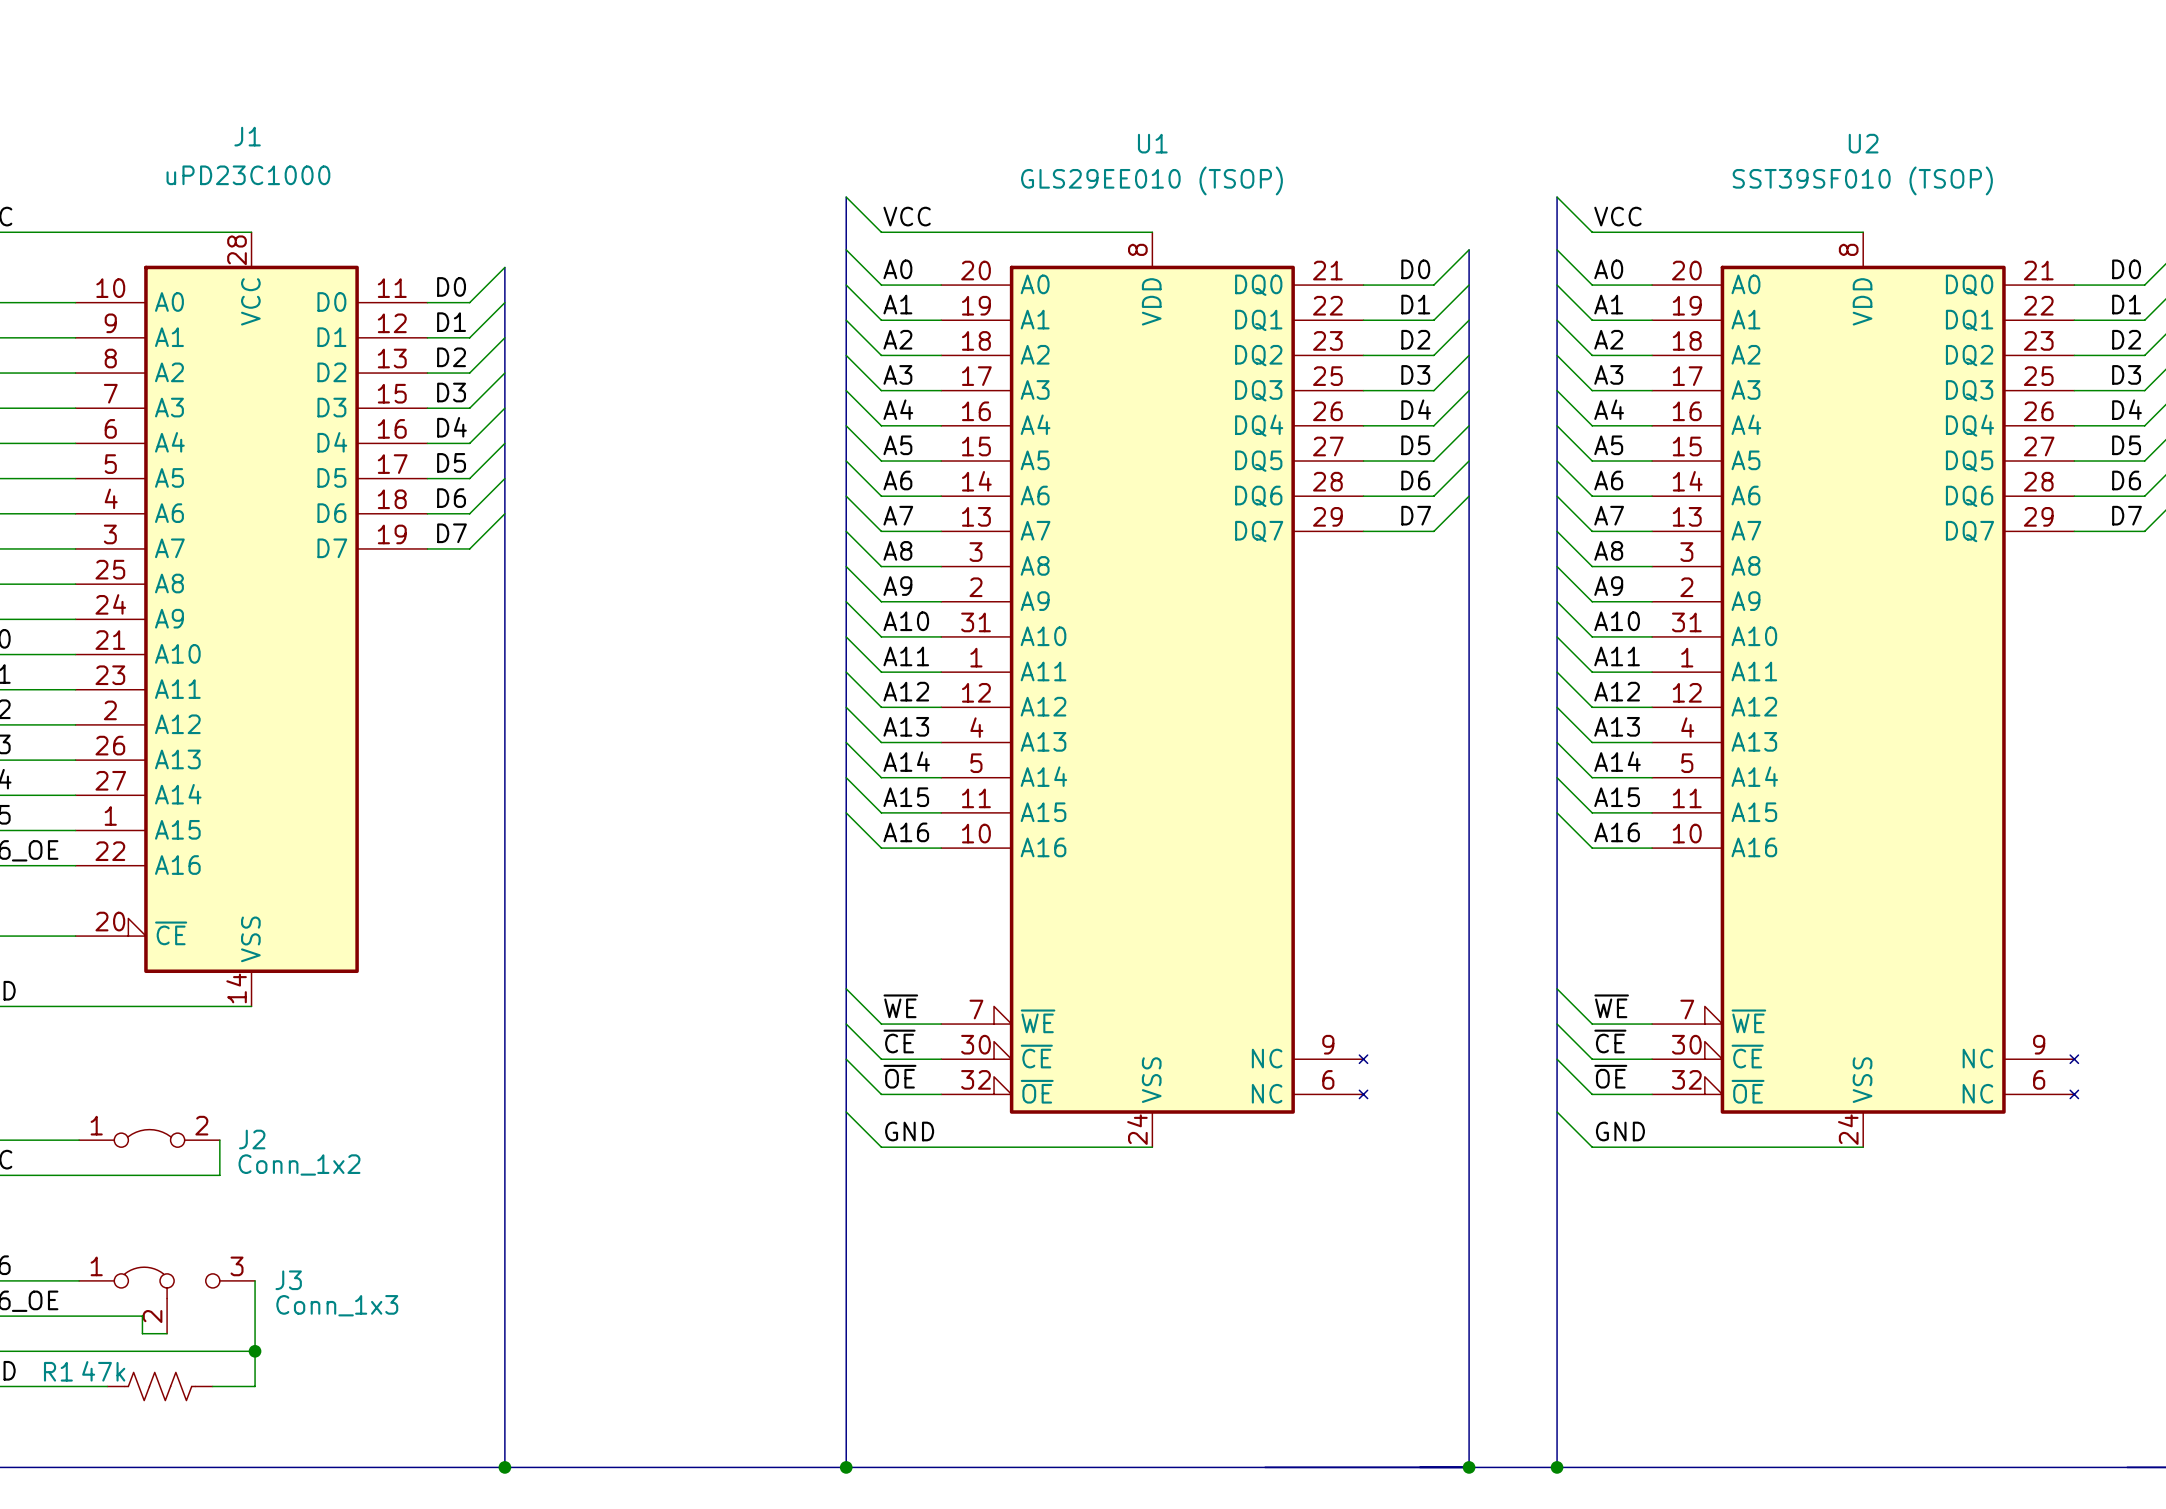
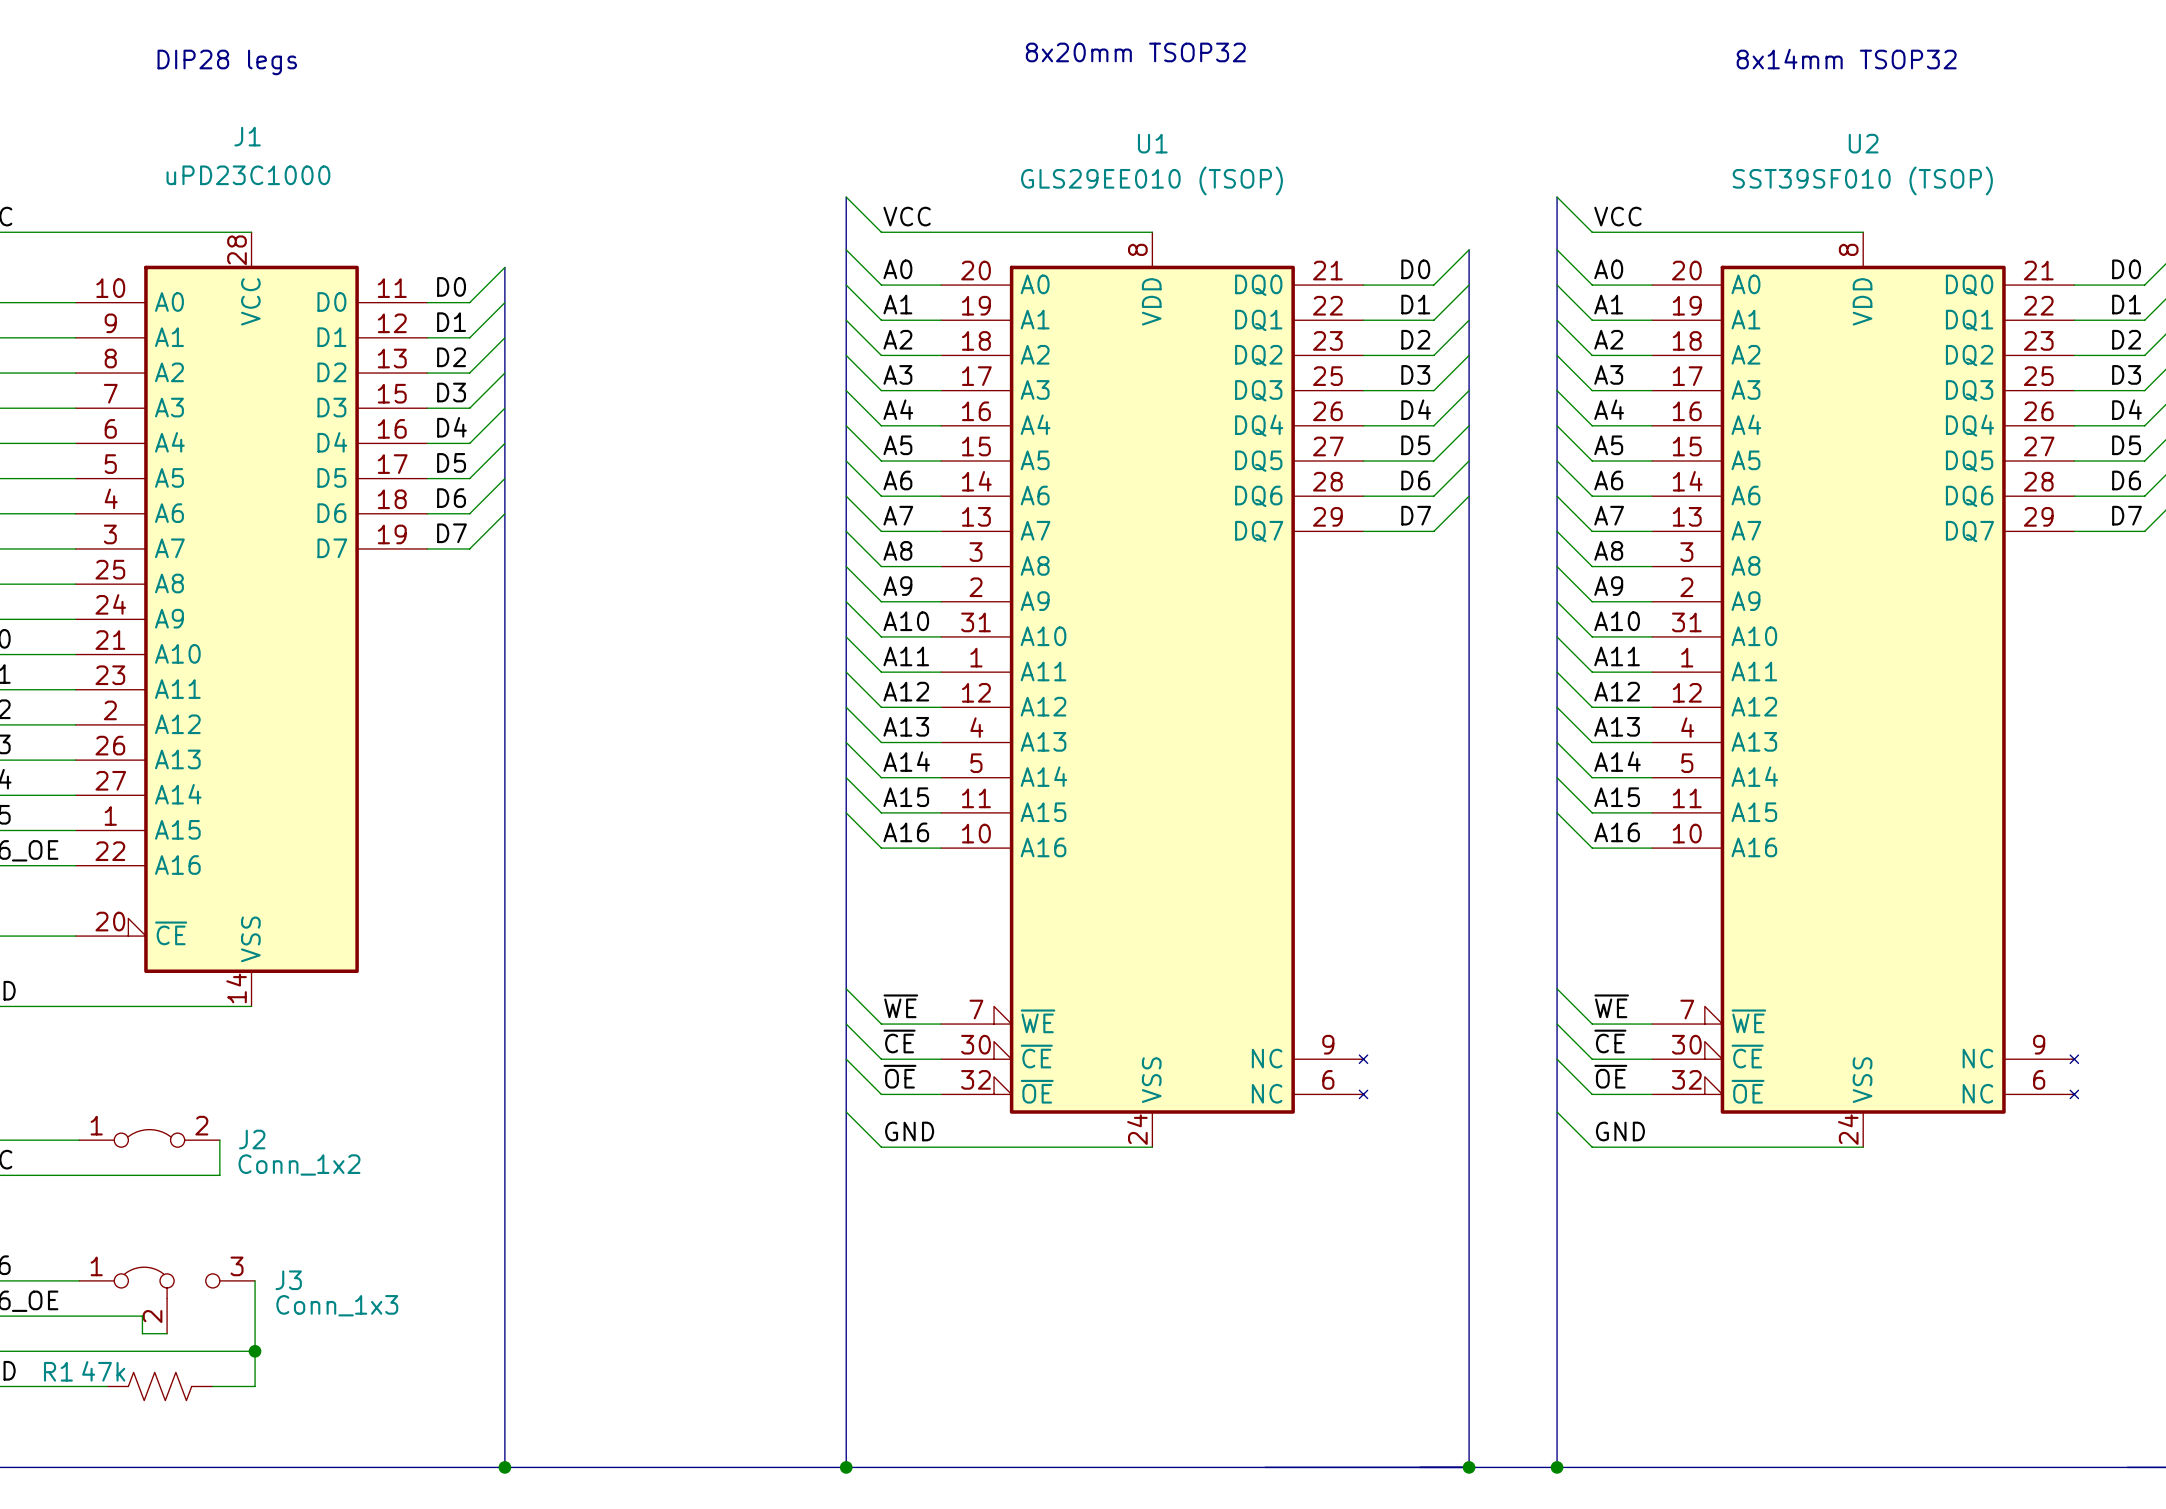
text: none -> 8x20mm TSOP32 (1135, 52)
text: none -> 8x14mm TSOP32 (1846, 59)
text: none -> DIP28 legs (227, 62)

